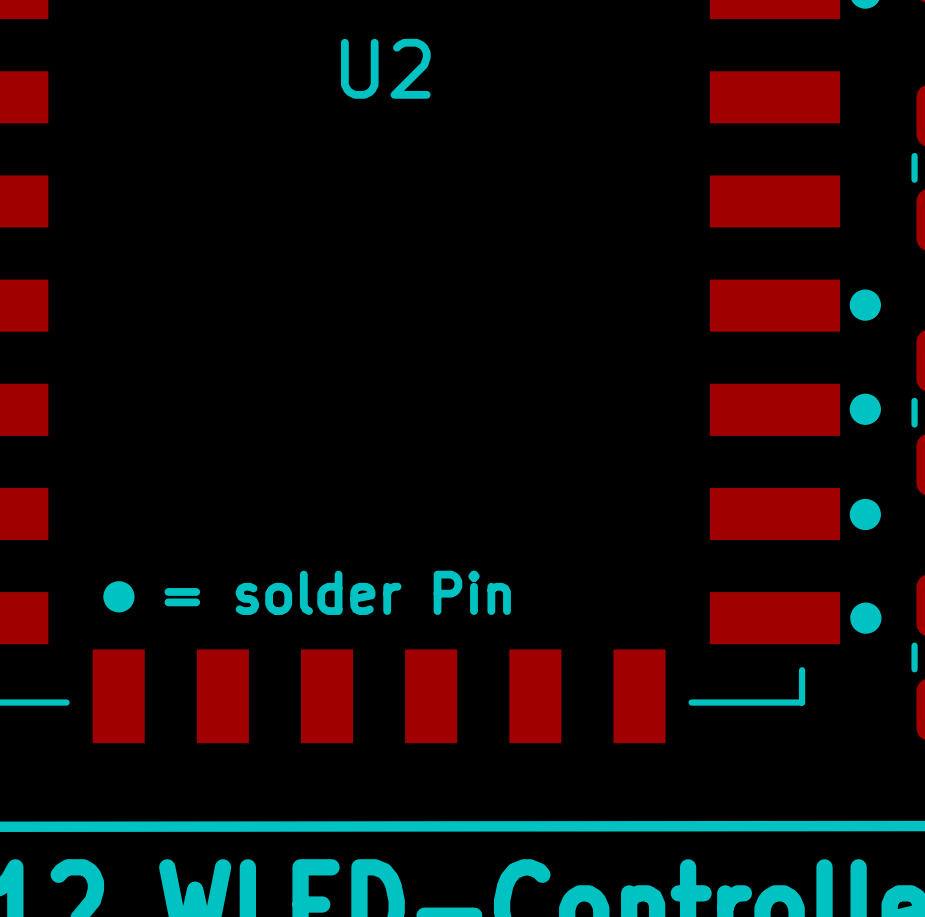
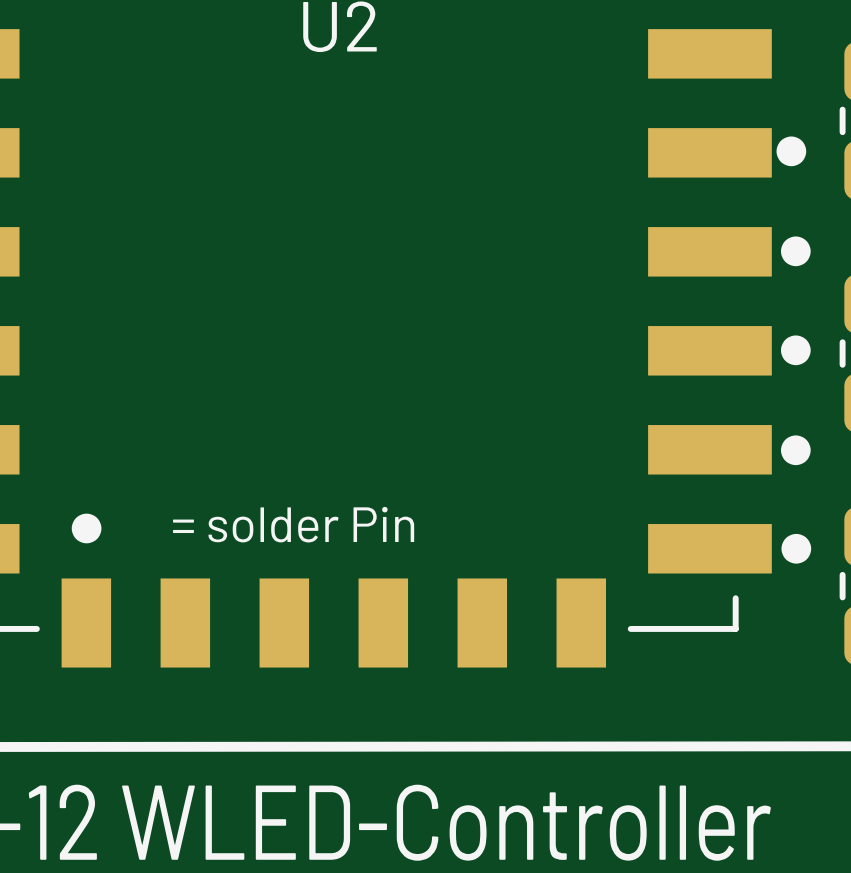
drawing: none -> [776, 136, 807, 167]

